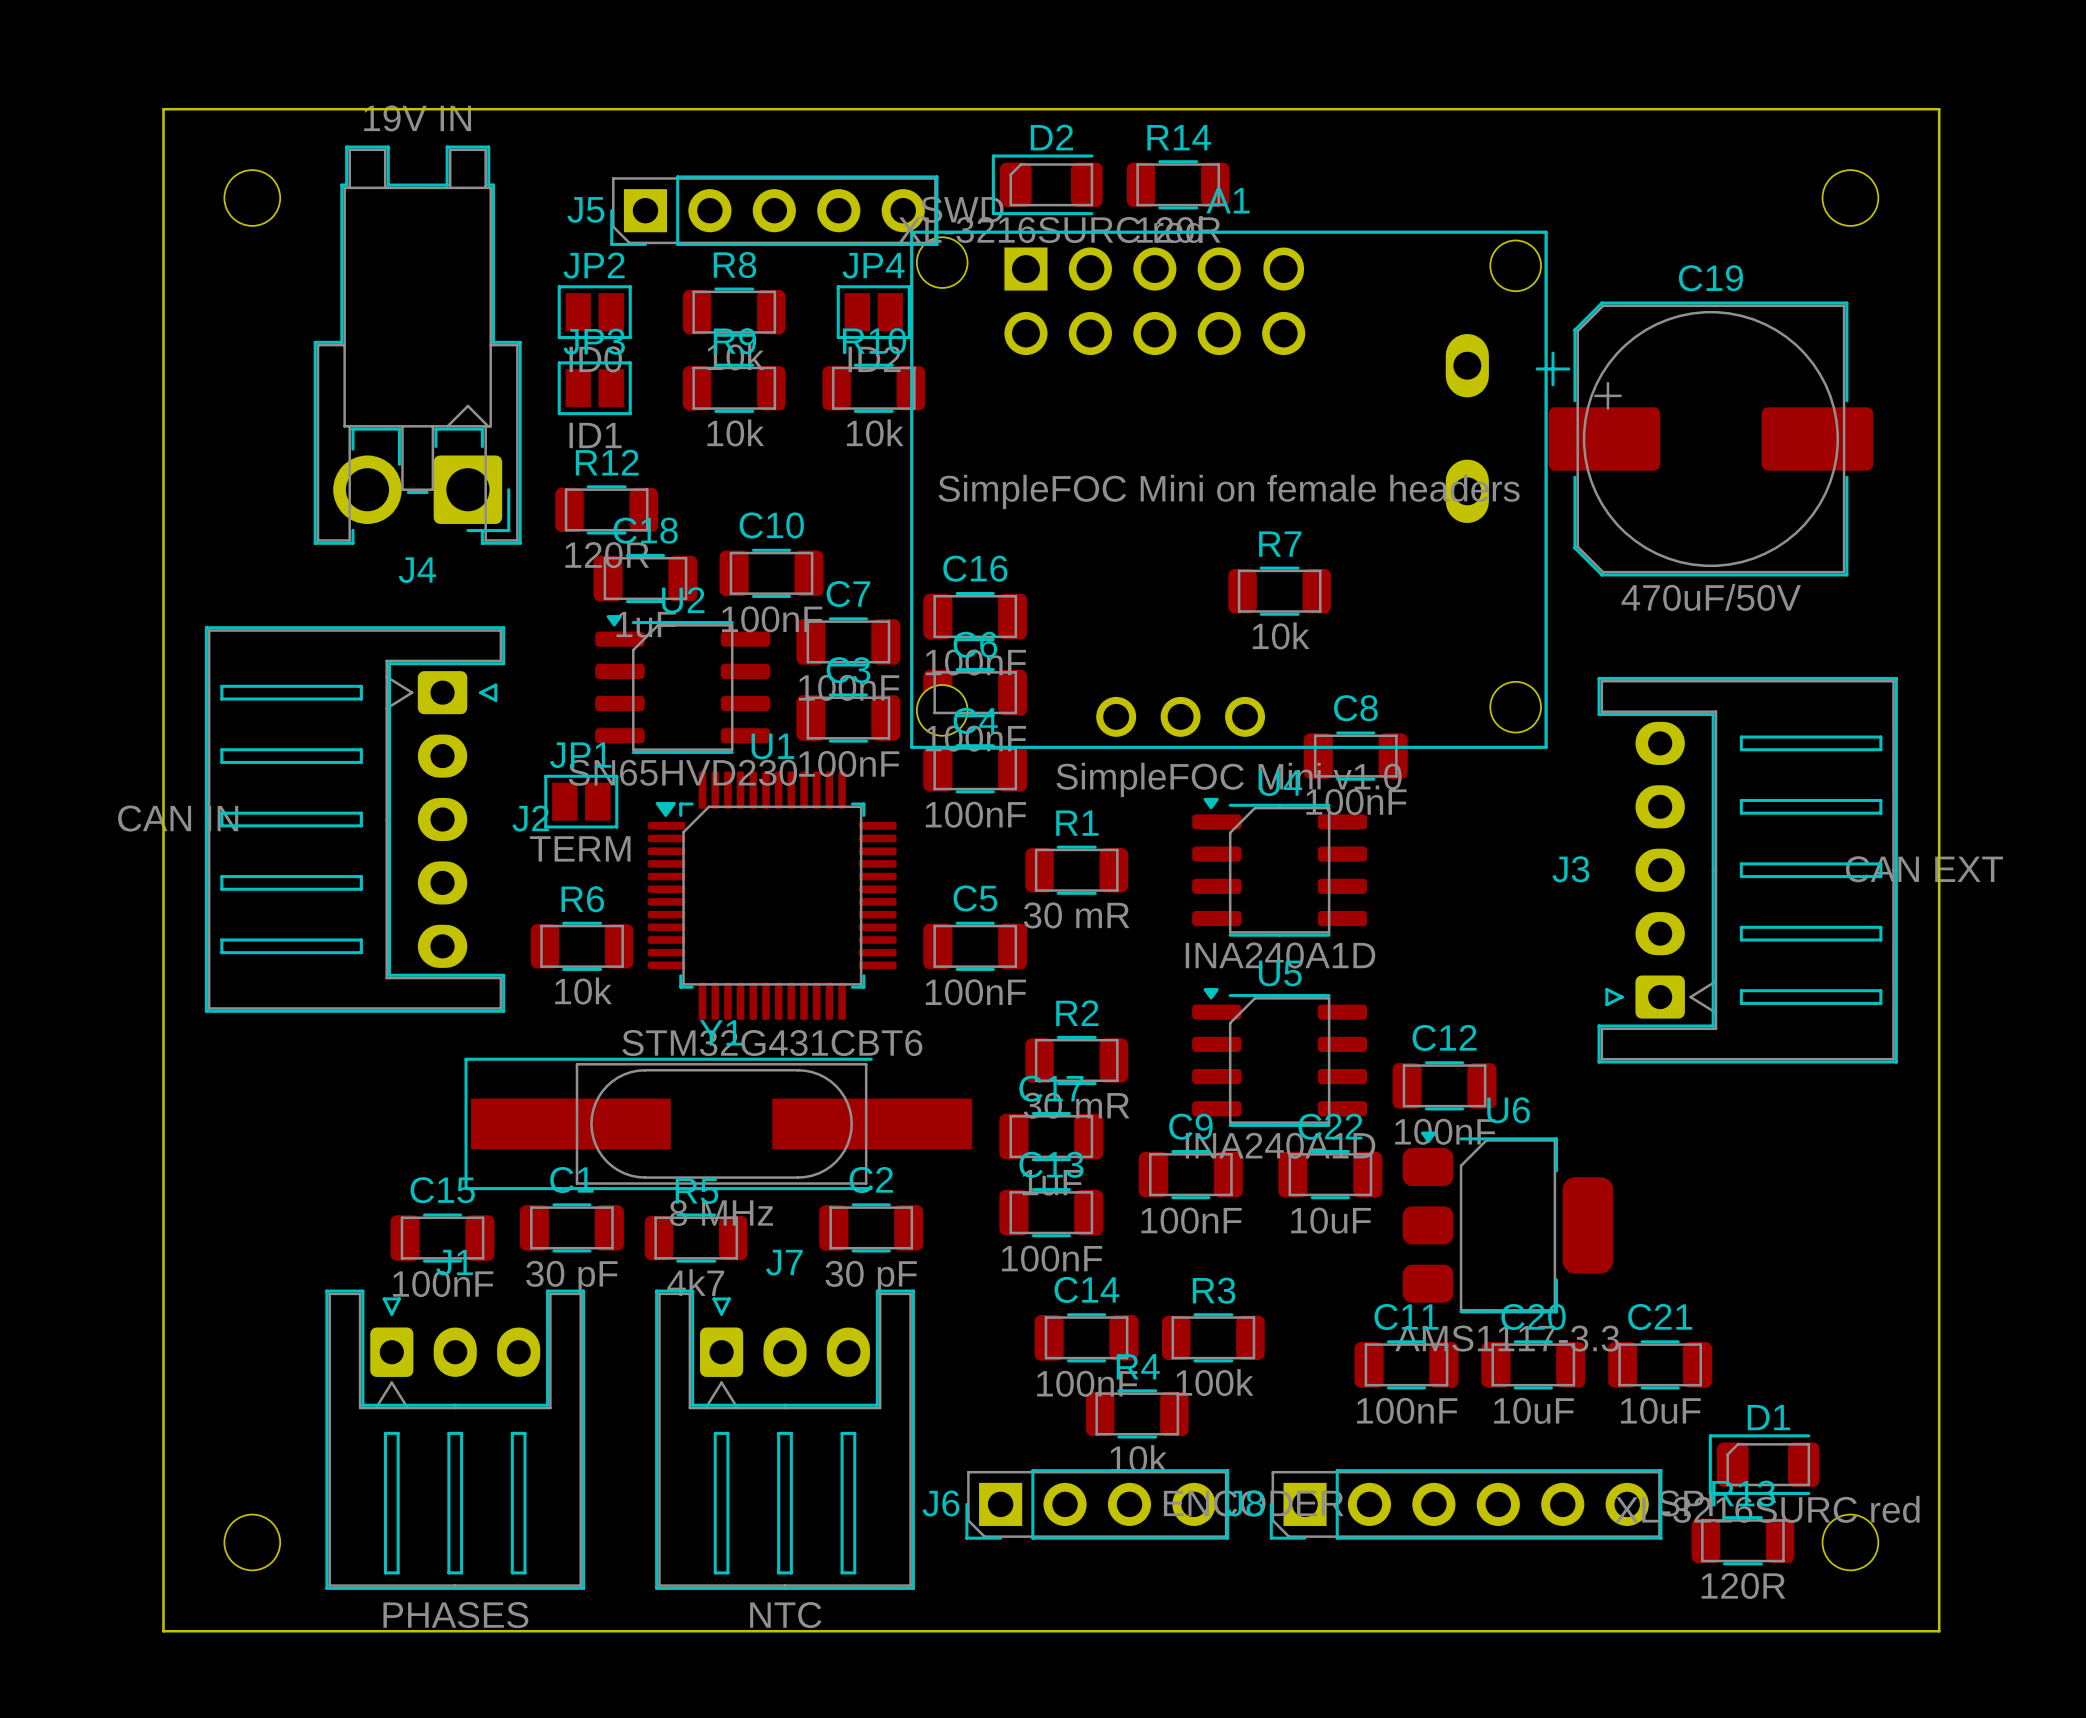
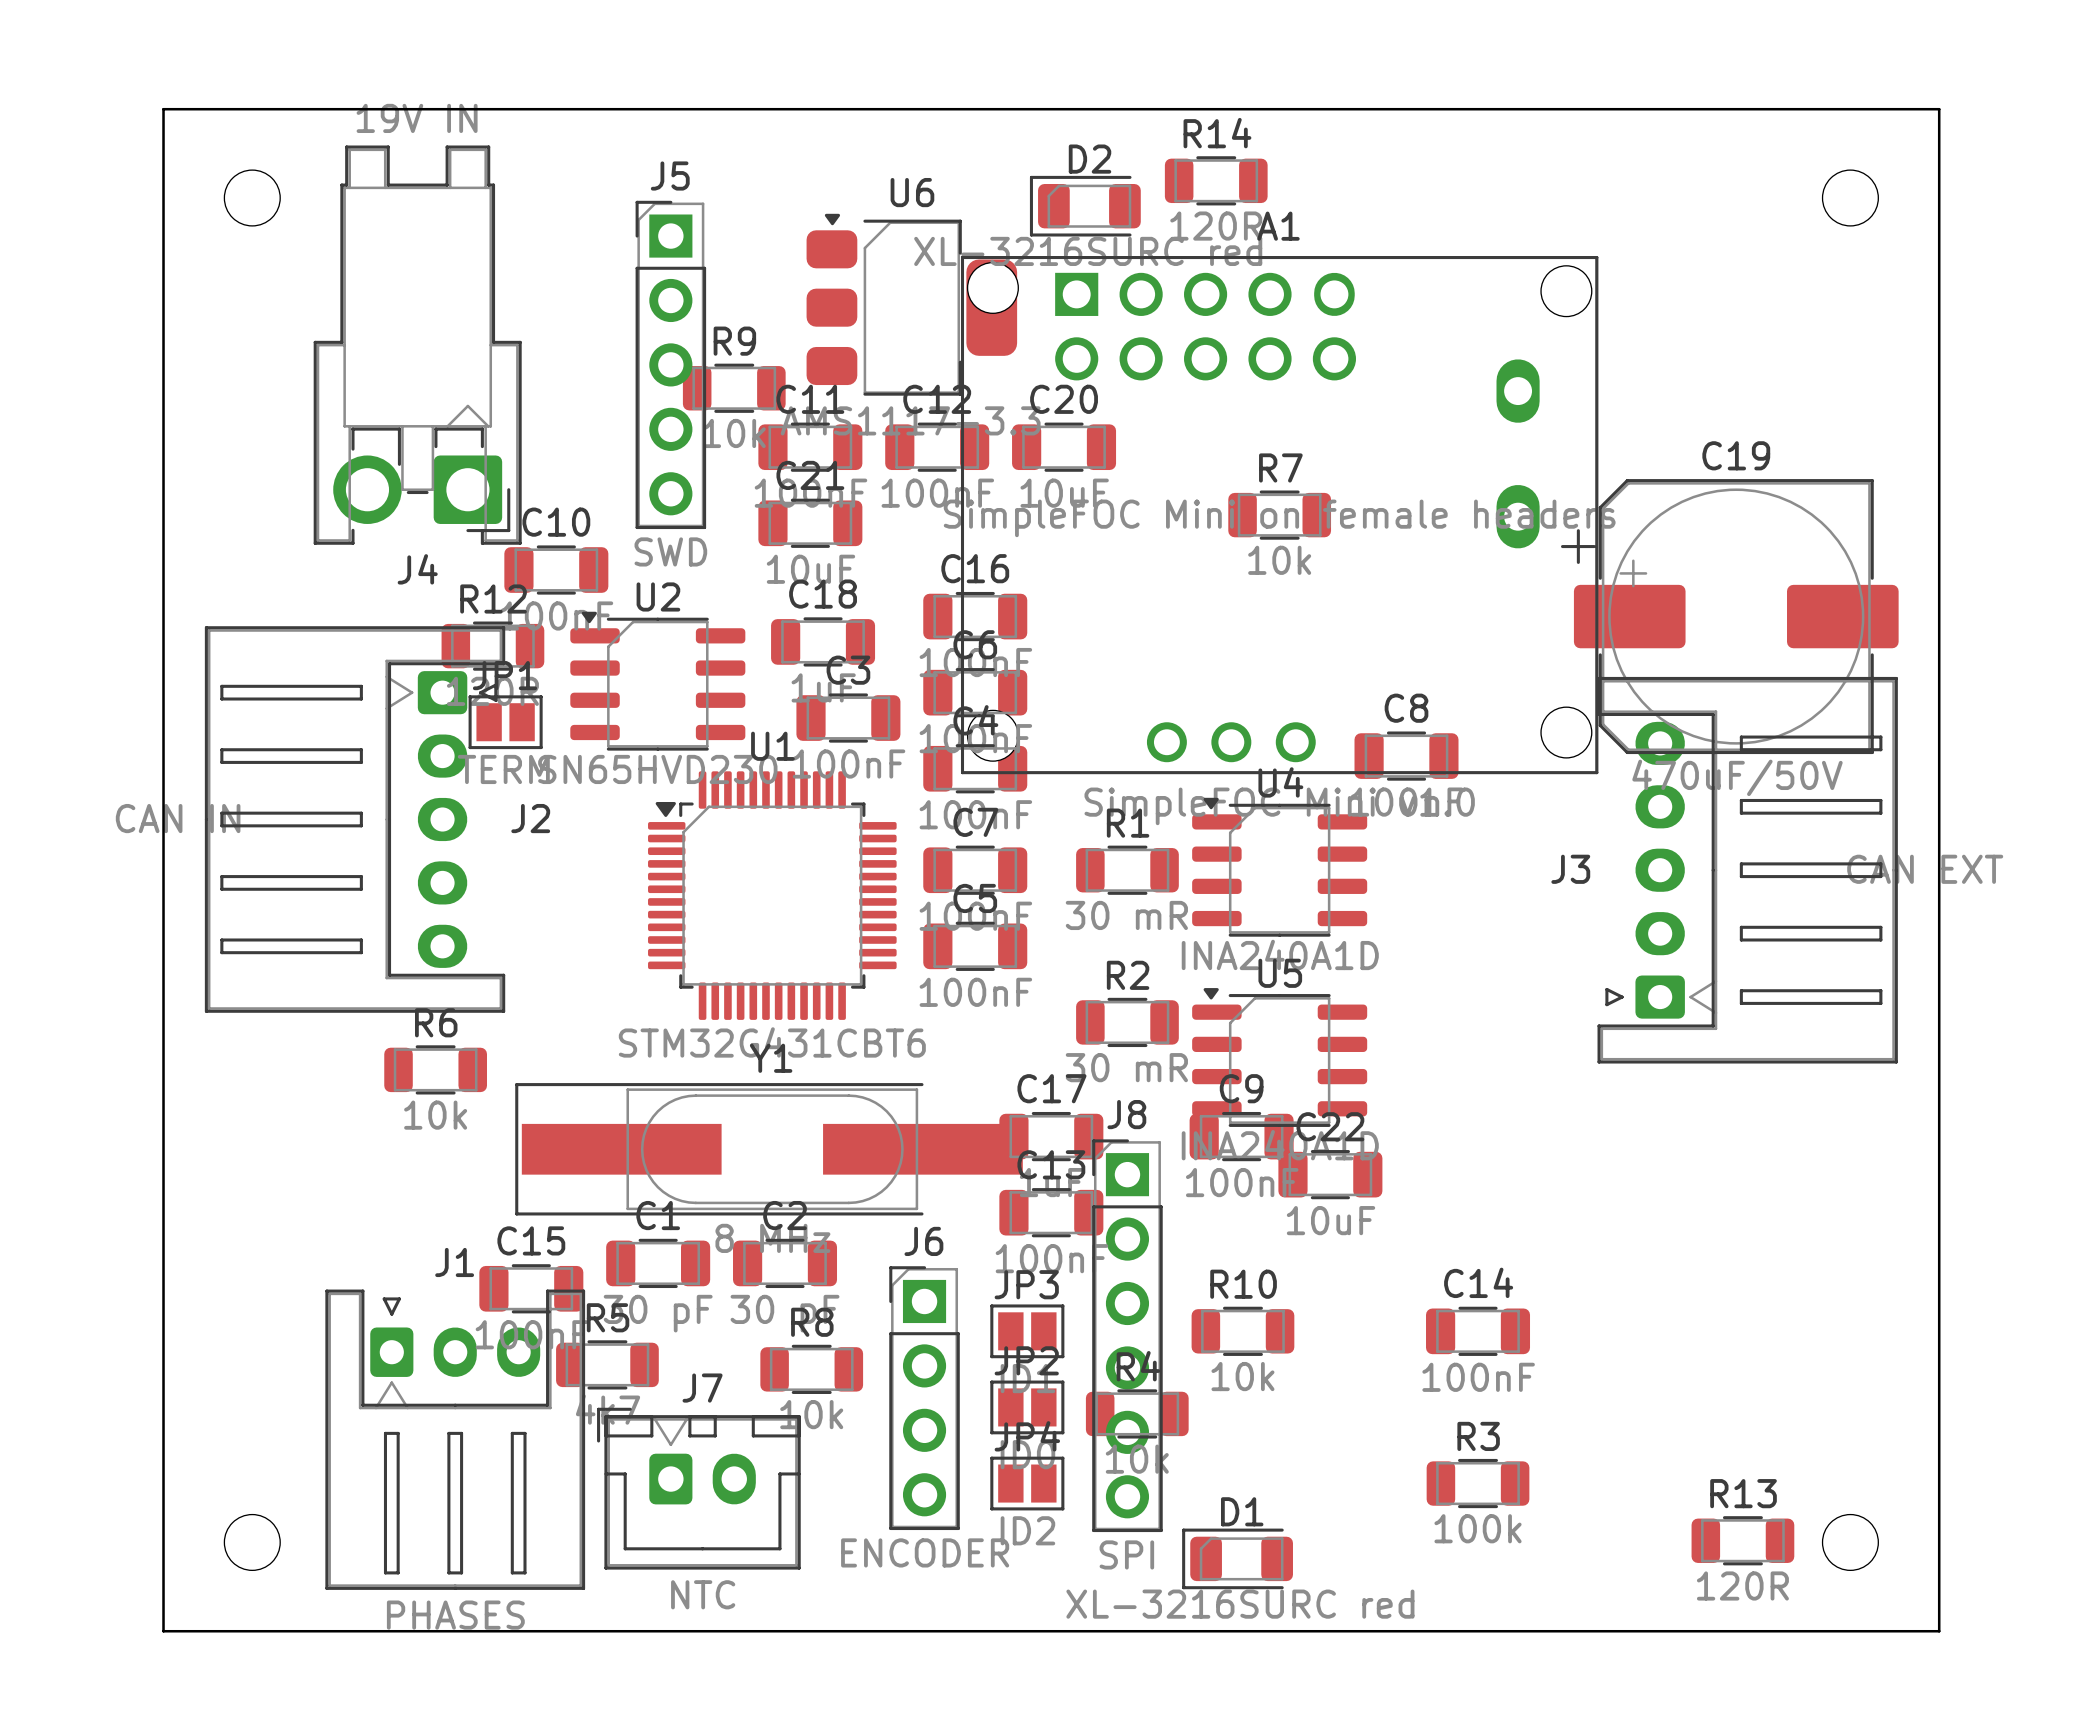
D2 position: (1047, 184) -> (1085, 206)
R14 position: (1178, 184) -> (1216, 180)
J5 rotation: 0° (774, 210) -> 90° clockwise (670, 364)
JP2 position: (594, 312) -> (1027, 1407)
R8 position: (734, 312) -> (811, 1369)
JP4 position: (873, 312) -> (1027, 1483)
JP3 position: (594, 388) -> (1027, 1331)
R10 position: (873, 388) -> (1242, 1331)
C19 position: (1704, 438) -> (1729, 616)
A1 position: (1228, 489) -> (1279, 515)
R12 position: (606, 509) -> (492, 646)
C10 position: (771, 573) -> (556, 570)
C18 position: (645, 578) -> (823, 641)
R7 position: (1279, 591) -> (1279, 515)
C7 position: (848, 641) -> (975, 870)
U2 position: (682, 684) -> (657, 681)
C8 position: (1355, 756) -> (1406, 756)
JP1 position: (581, 801) -> (505, 722)
R1 position: (1076, 870) -> (1127, 870)
R6 position: (582, 946) -> (435, 1069)
R2 position: (1076, 1060) -> (1127, 1022)
C12 position: (1444, 1085) -> (937, 447)
Y1 position: (718, 1123) -> (769, 1149)
C9 position: (1190, 1174) -> (1241, 1136)
U6 position: (1507, 1222) -> (911, 304)
C1 position: (571, 1227) -> (658, 1263)
C2 position: (871, 1227) -> (785, 1263)
C15 position: (442, 1238) -> (531, 1288)
R5 position: (696, 1238) -> (607, 1364)
J7 name position: J7 (784, 1262) -> J7 (702, 1388)
J7 footprint: [655, 1289, 915, 1590] -> [597, 1407, 801, 1570]
C14 position: (1086, 1337) -> (1478, 1331)
R3 position: (1213, 1337) -> (1478, 1483)
C11 position: (1406, 1364) -> (810, 447)
C20 position: (1533, 1364) -> (1064, 447)
C21 position: (1660, 1364) -> (810, 523)
D1 position: (1764, 1464) -> (1237, 1558)
J6 rotation: 0° (1097, 1504) -> 90° clockwise (924, 1398)
J6 position: (1097, 1504) -> (924, 1398)
J8 rotation: 0° (1466, 1504) -> 90° clockwise (1127, 1335)
J8 position: (1466, 1504) -> (1127, 1335)
J7 value position: NTC (785, 1615) -> NTC (703, 1594)

